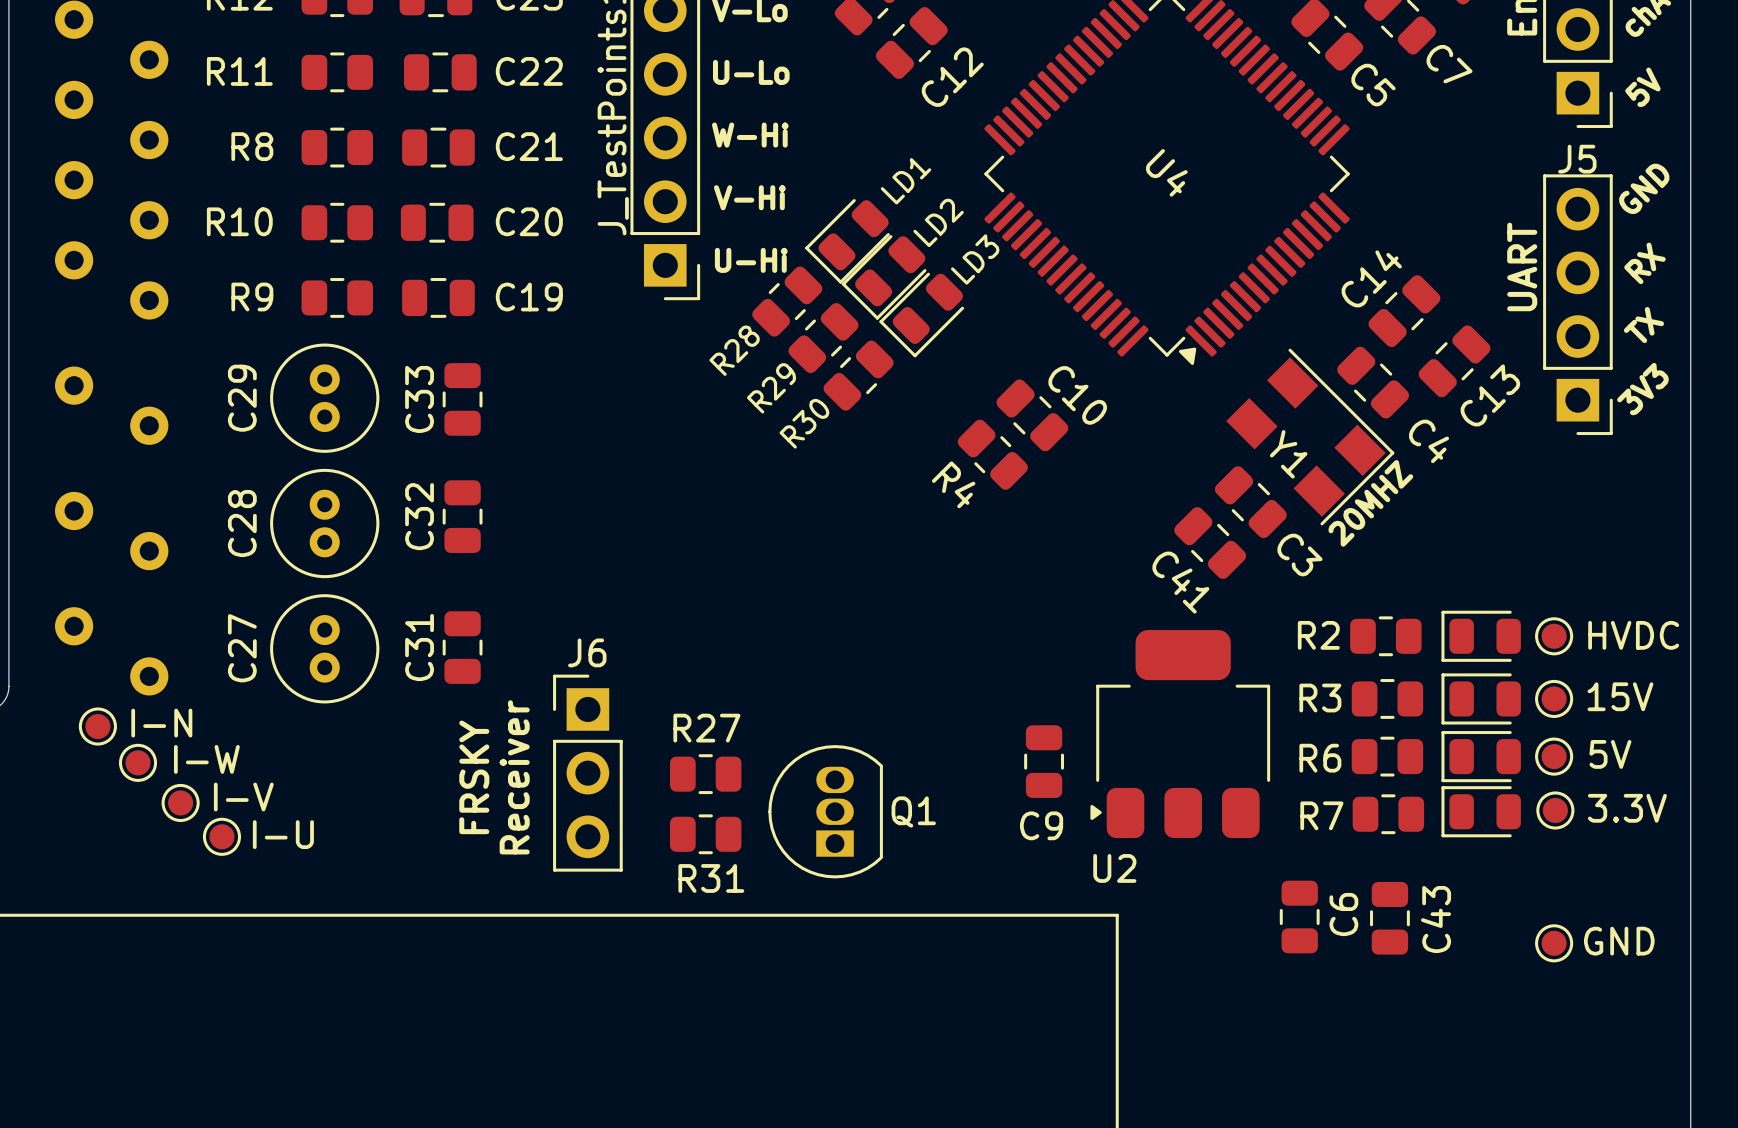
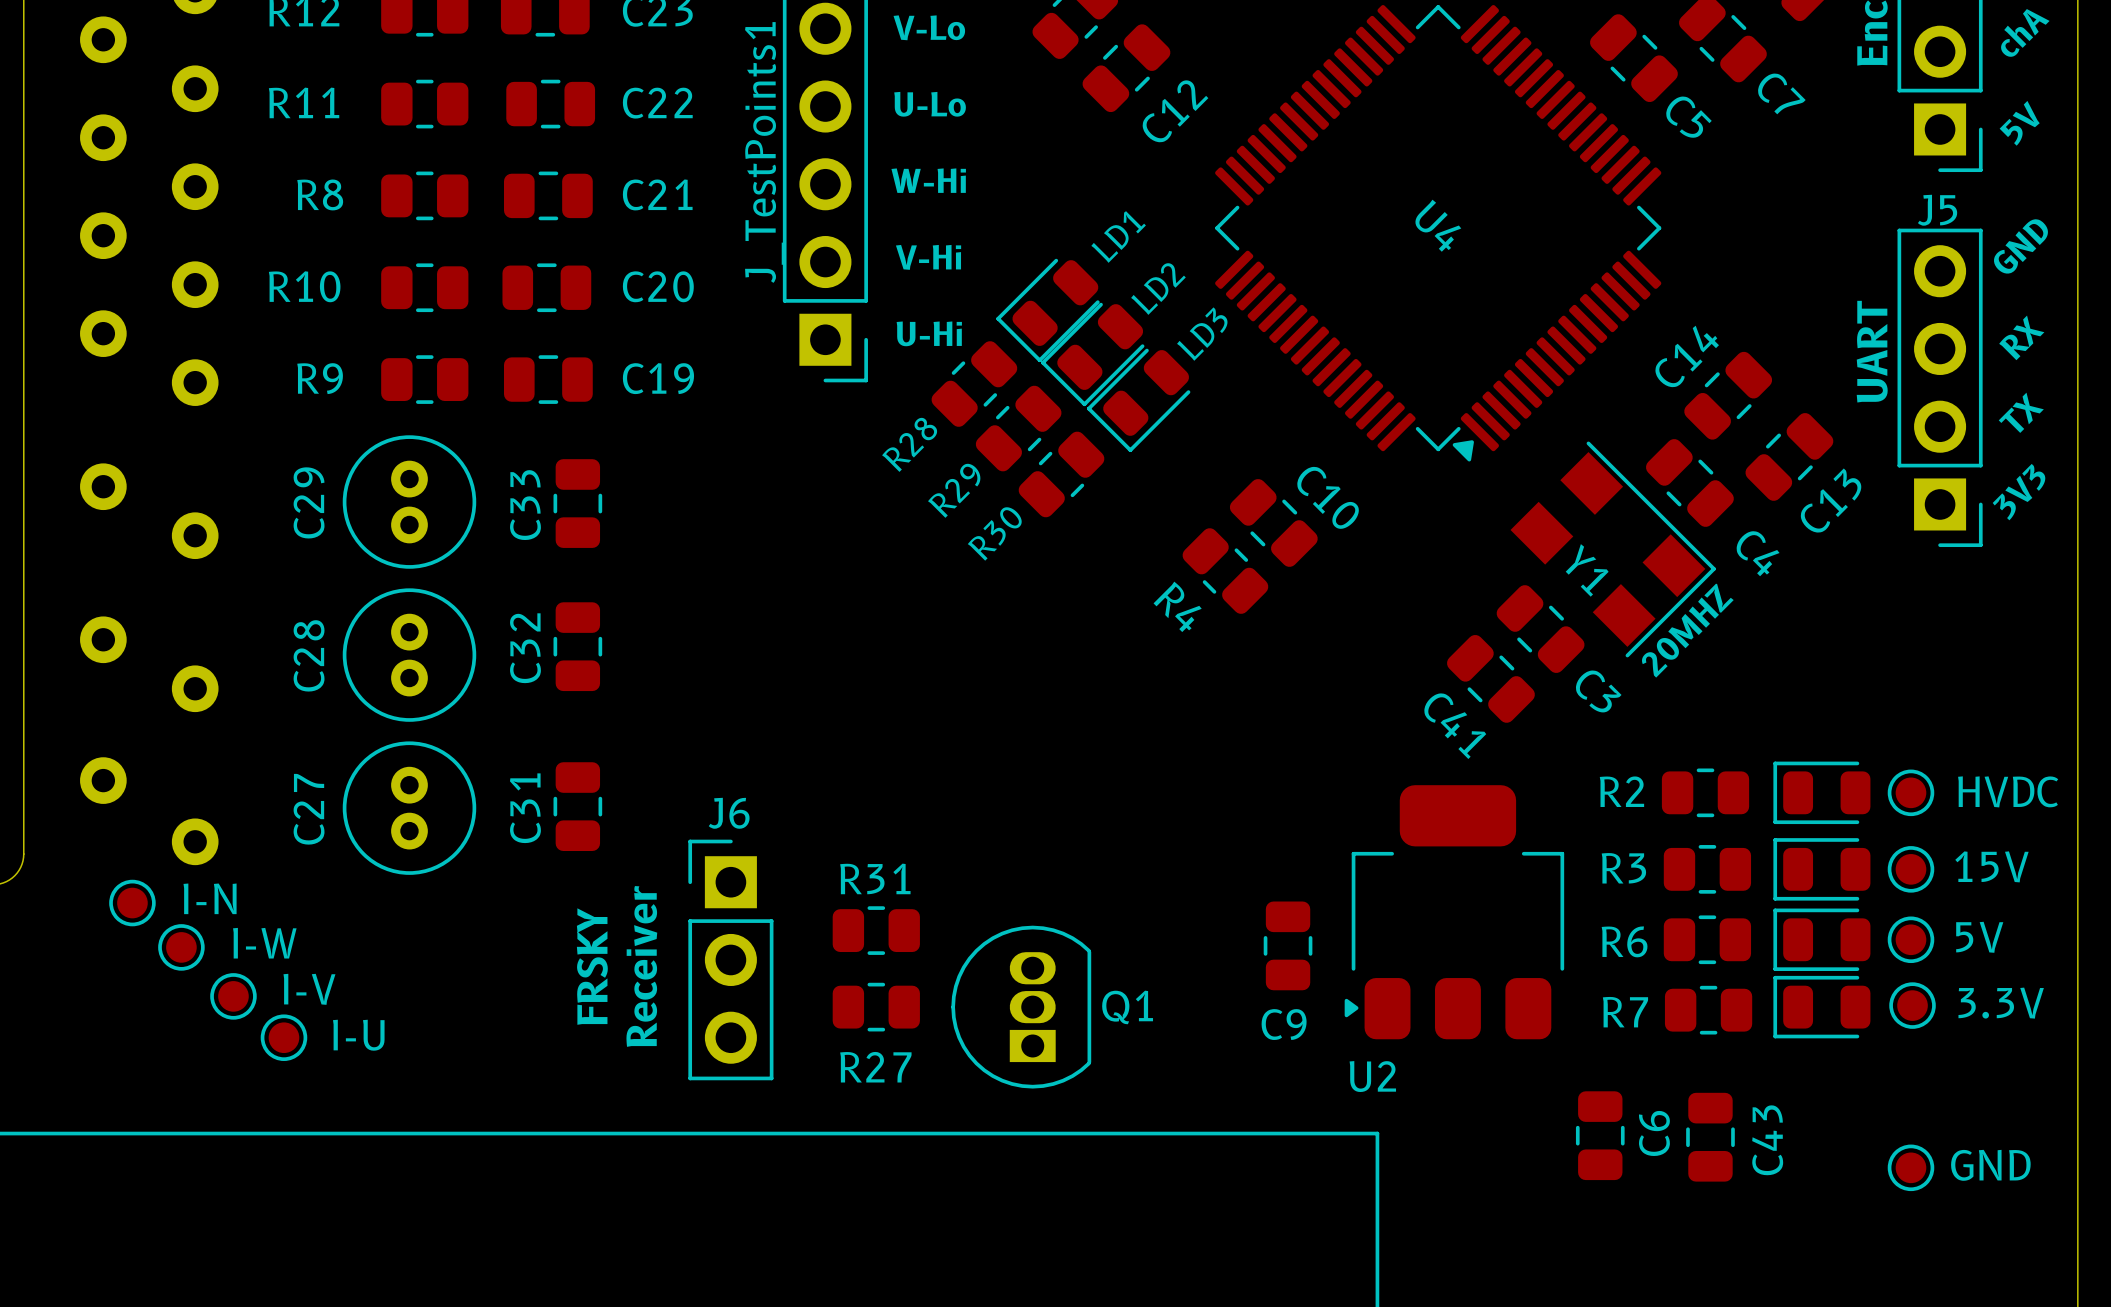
R27 name position: R27 (706, 728) -> R27 (875, 1067)
R27 position: (705, 774) -> (876, 1007)
R31 position: (705, 834) -> (876, 930)
R31 name position: R31 (711, 878) -> R31 (875, 878)

